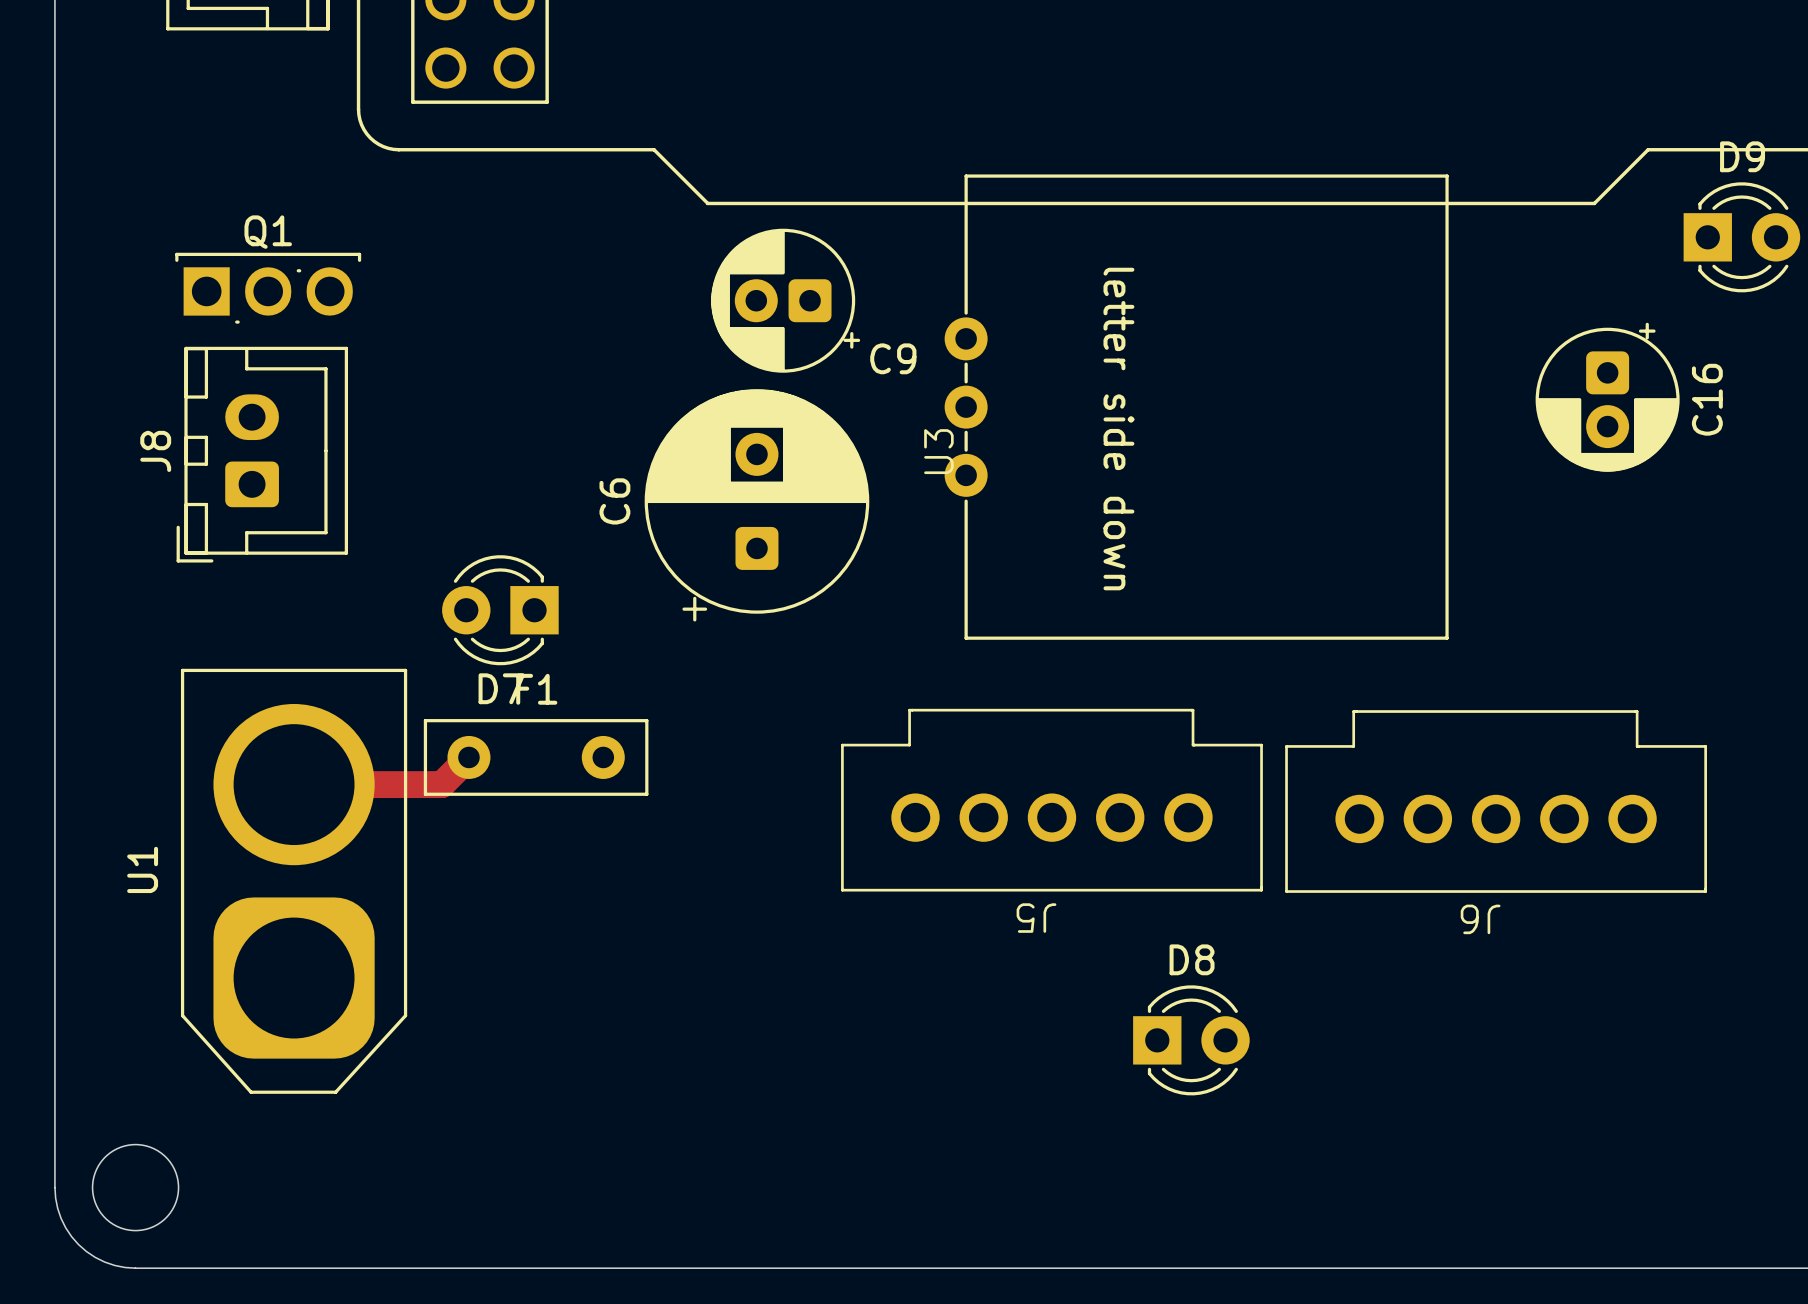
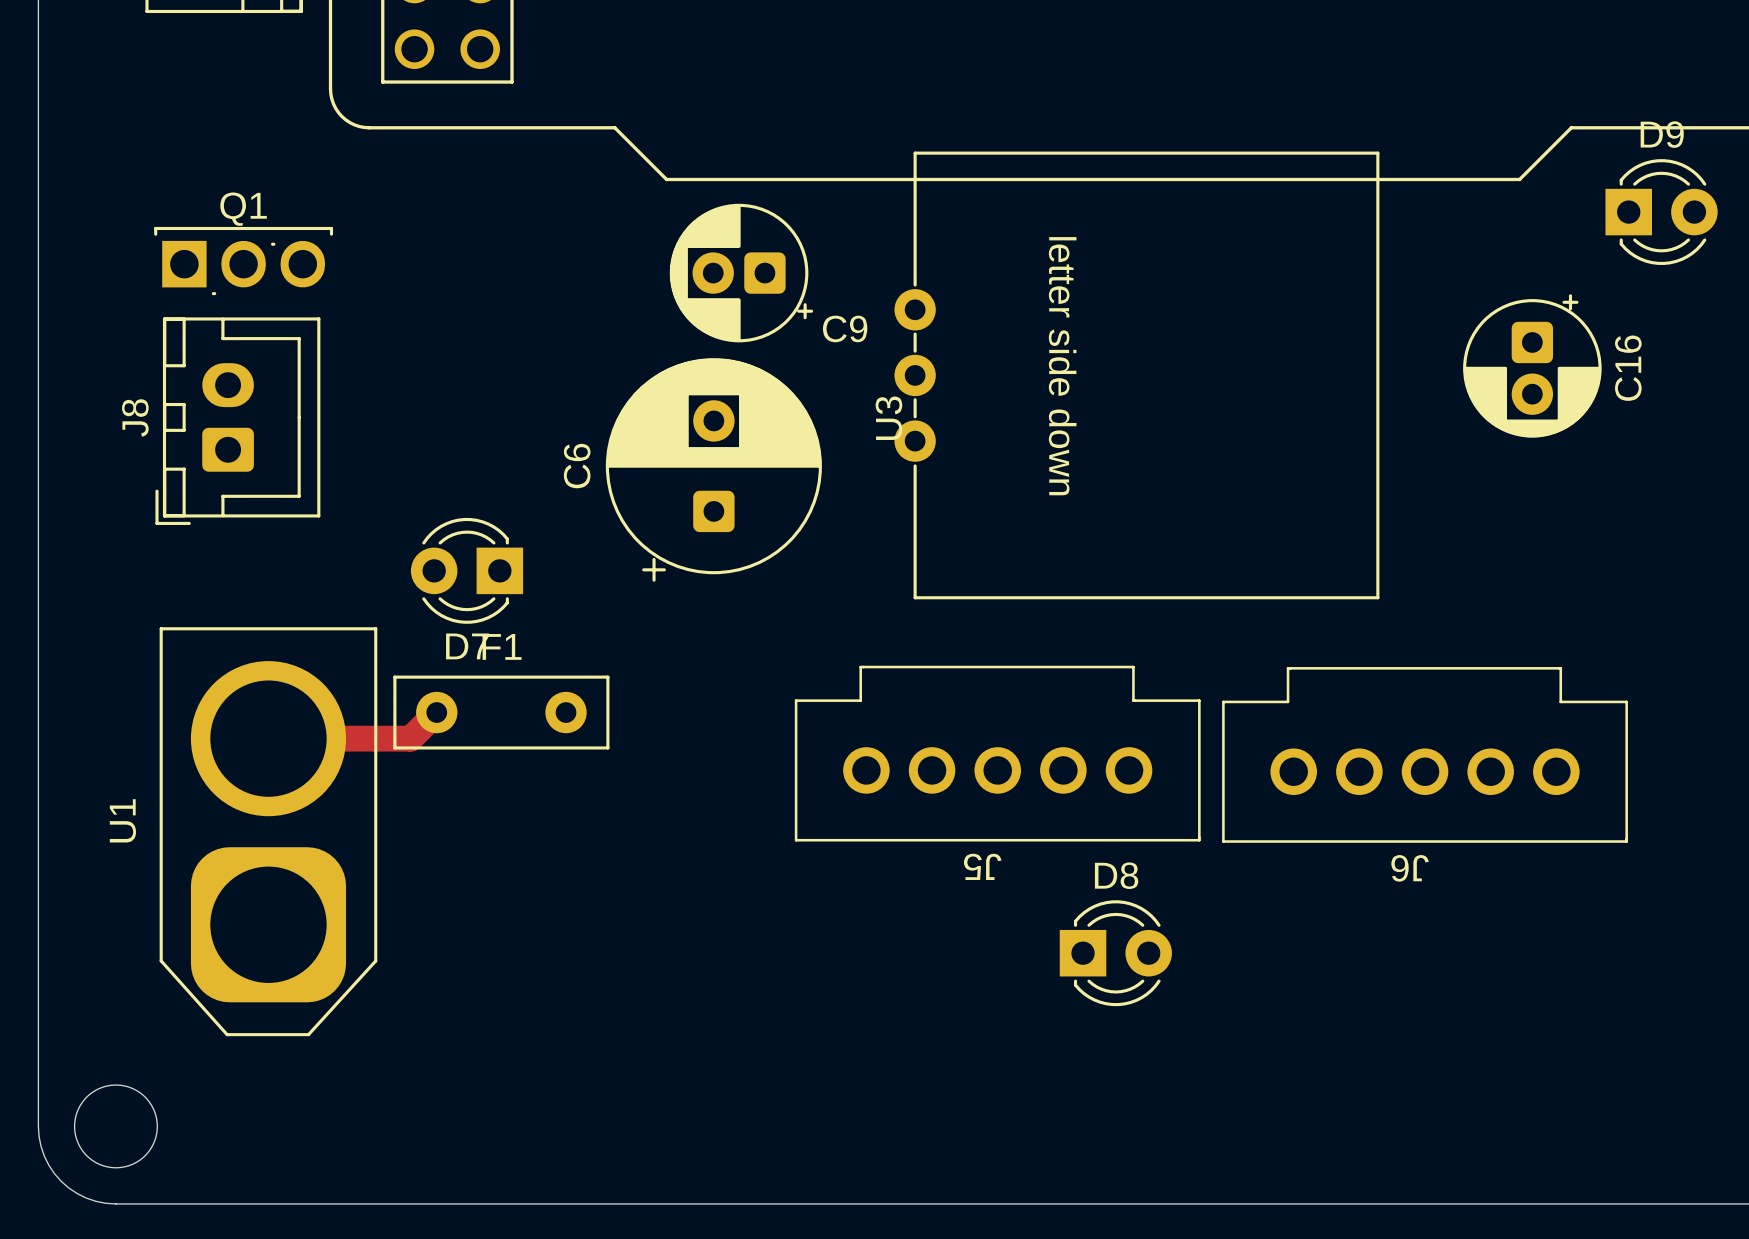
D8 position: (1191, 1040) -> (1115, 953)

